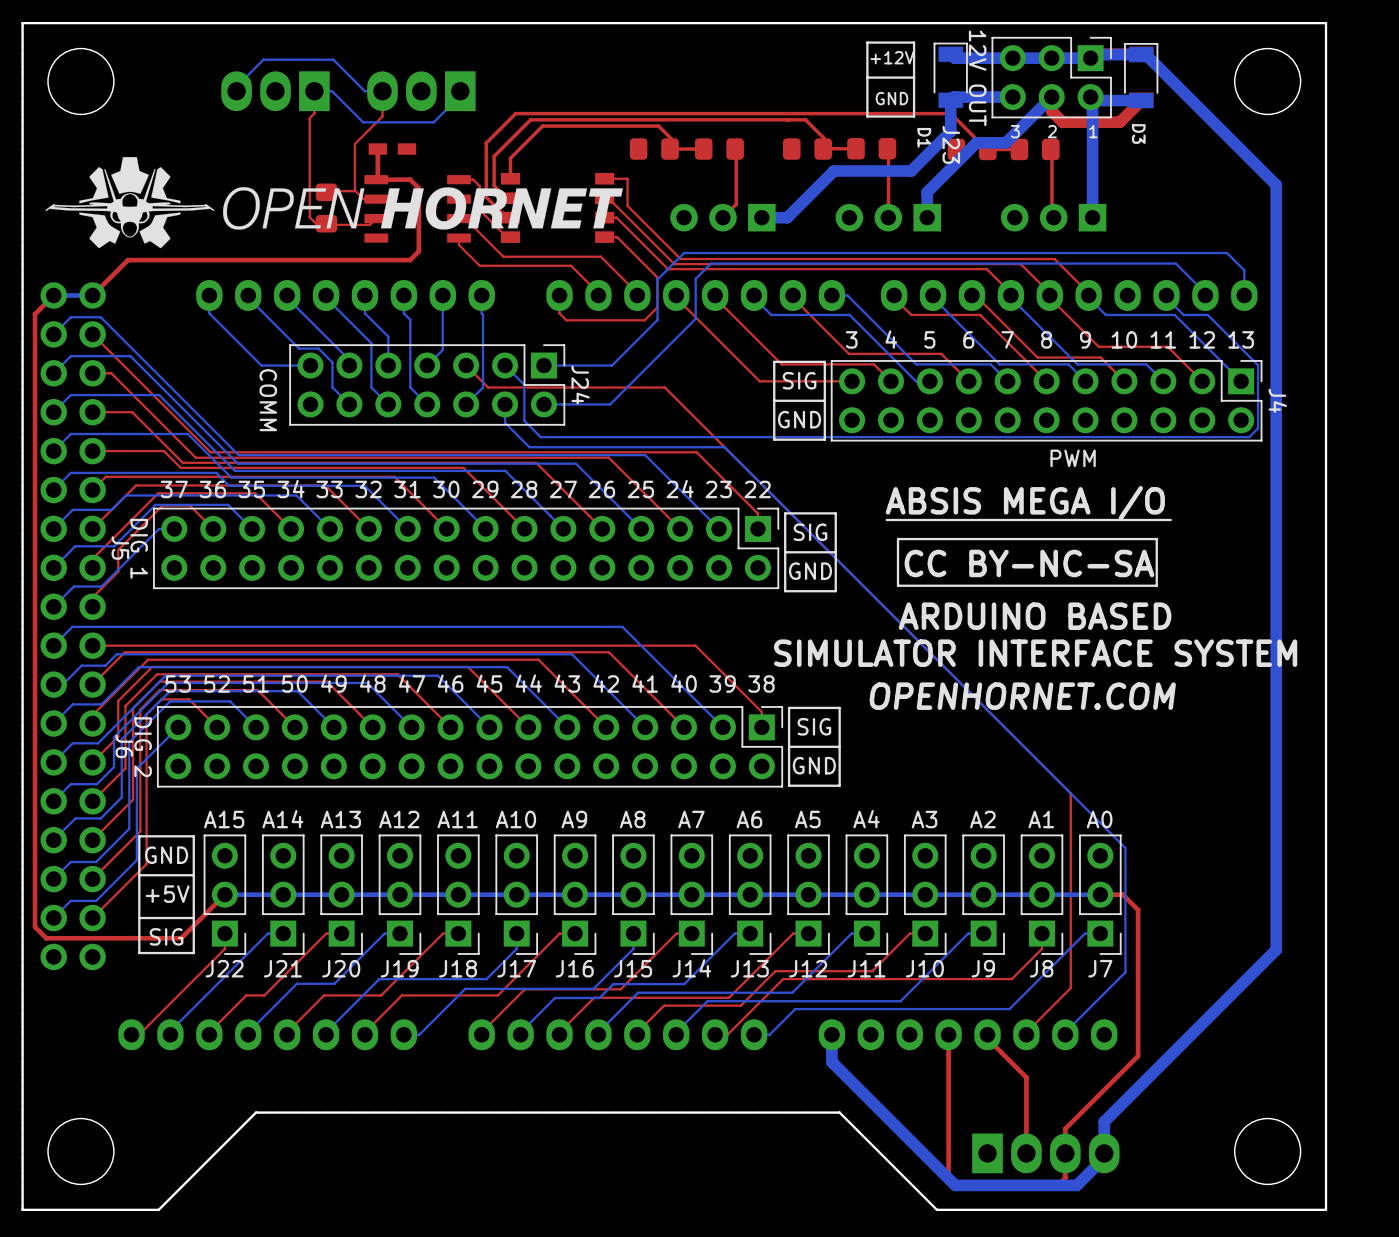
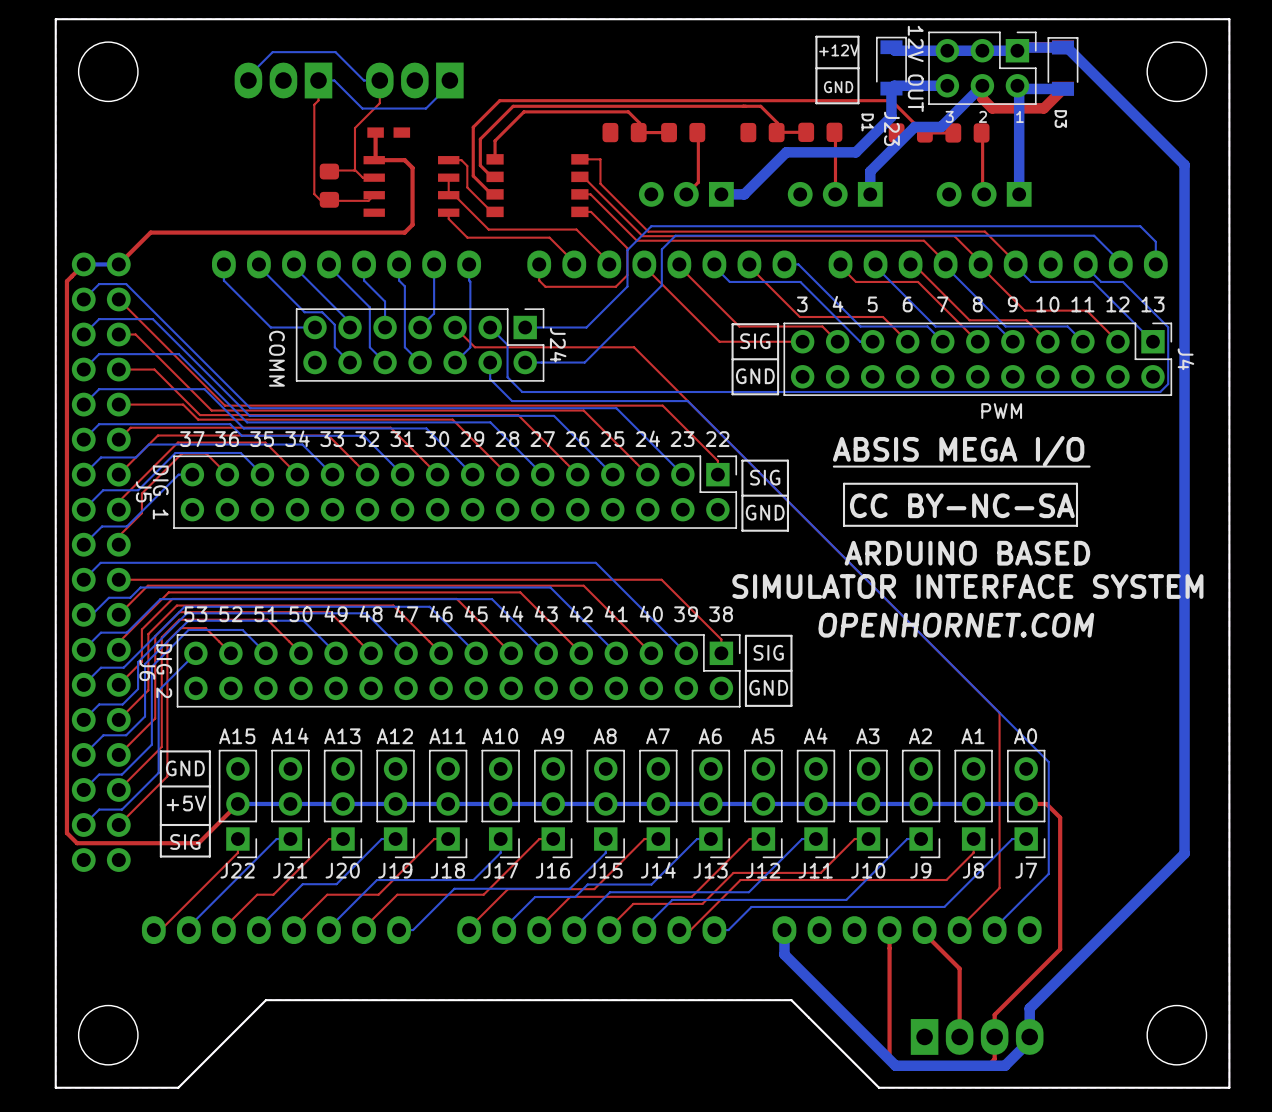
drawing: [45, 157, 623, 249] -> none

